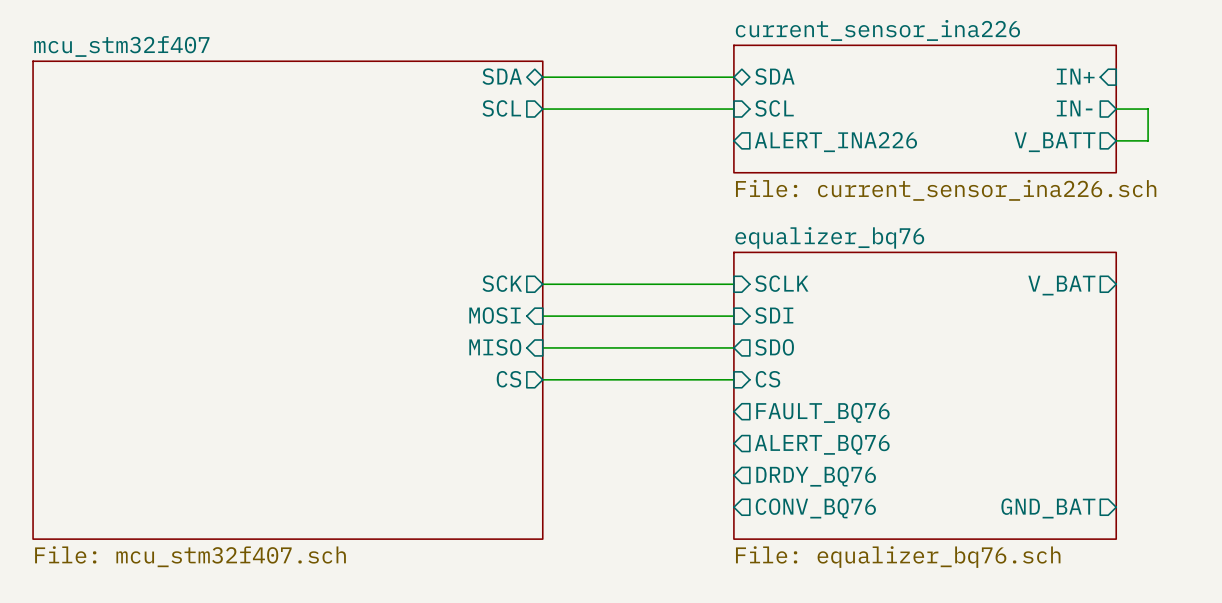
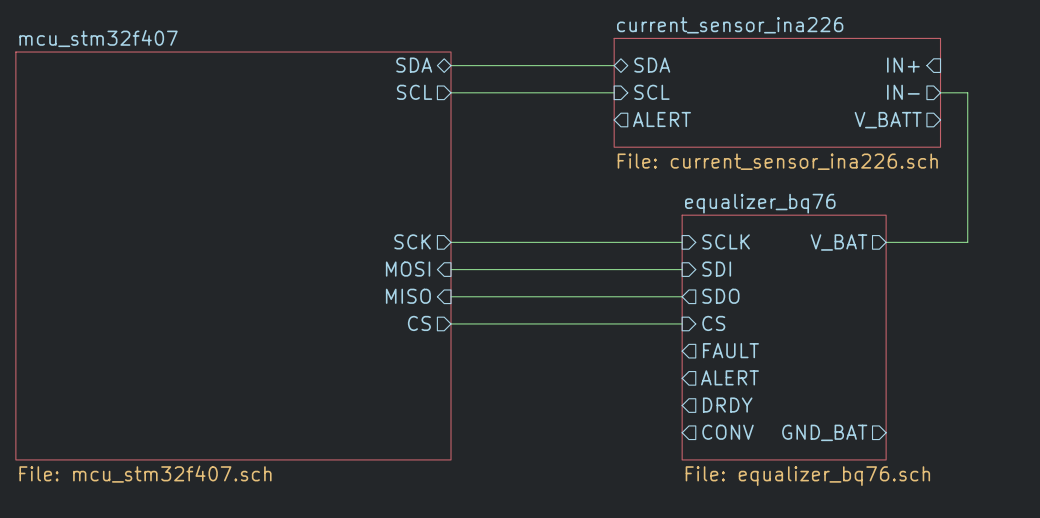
wire: (1116, 140) (1148, 140) -> (886, 242) (967, 242) (967, 120)
sheet pin: ALERT_INA226 (835, 142) -> ALERT (661, 119)
sheet equalizer_bq76 name position: equalizer_bq76 (829, 237) -> equalizer_bq76 (760, 203)
sheet equalizer_bq76 shape: [733, 252, 1117, 540] -> [682, 215, 887, 460]
sheet pin position: SCLK (781, 283) -> SCLK (726, 241)
wire: none -> (614, 242) (682, 242)
sheet pin position: V_BAT (1061, 285) -> V_BAT (838, 242)
sheet pin position: SDI (774, 315) -> SDI (716, 269)
wire: none -> (614, 269) (682, 269)
wire: none -> (614, 296) (682, 296)
sheet pin position: SDO (774, 347) -> SDO (720, 296)
wire: none -> (614, 323) (682, 323)
sheet pin position: CS (767, 379) -> CS (713, 323)
sheet pin: FAULT_BQ76 (822, 412) -> FAULT (730, 350)
sheet pin: ALERT_BQ76 (822, 444) -> ALERT (729, 377)
sheet pin: DRDY_BQ76 (816, 476) -> DRDY (727, 405)
sheet pin: CONV_BQ76 (815, 508) -> CONV (728, 432)
sheet pin position: GND_BAT (1048, 508) -> GND_BAT (824, 432)
sheet equalizer_bq76 value position: File: equalizer_bq76.sch (898, 557) -> File: equalizer_bq76.sch (807, 476)

